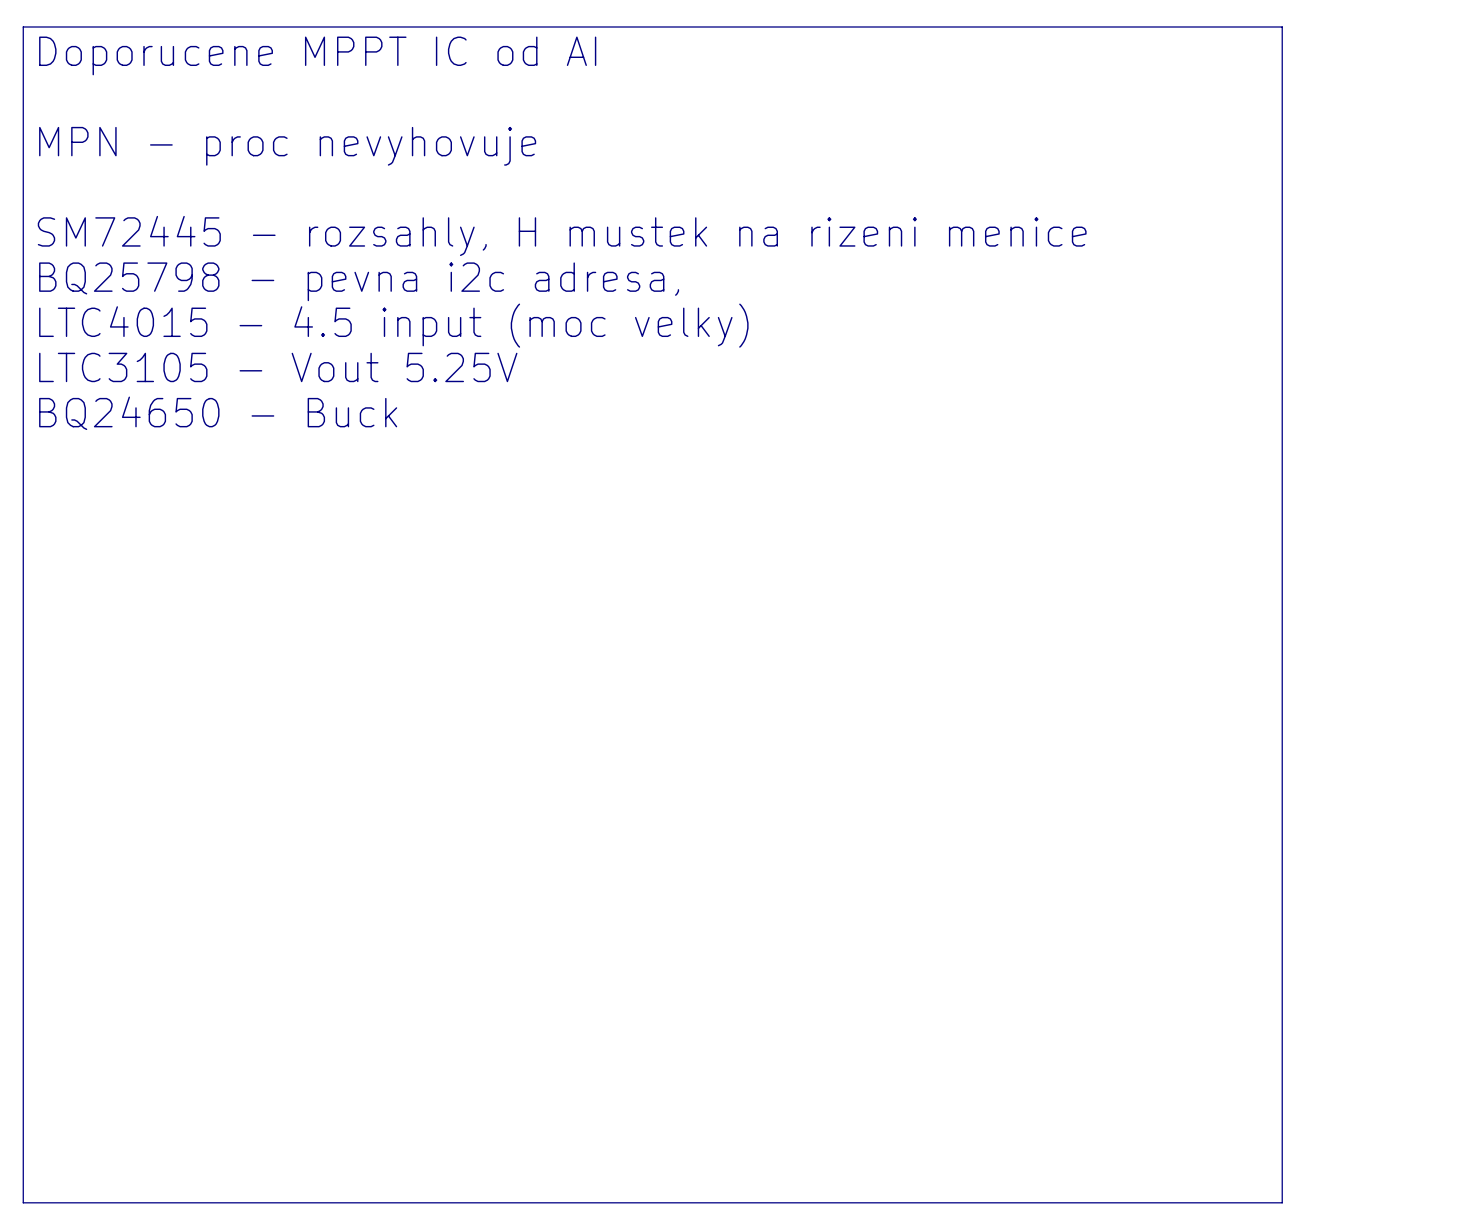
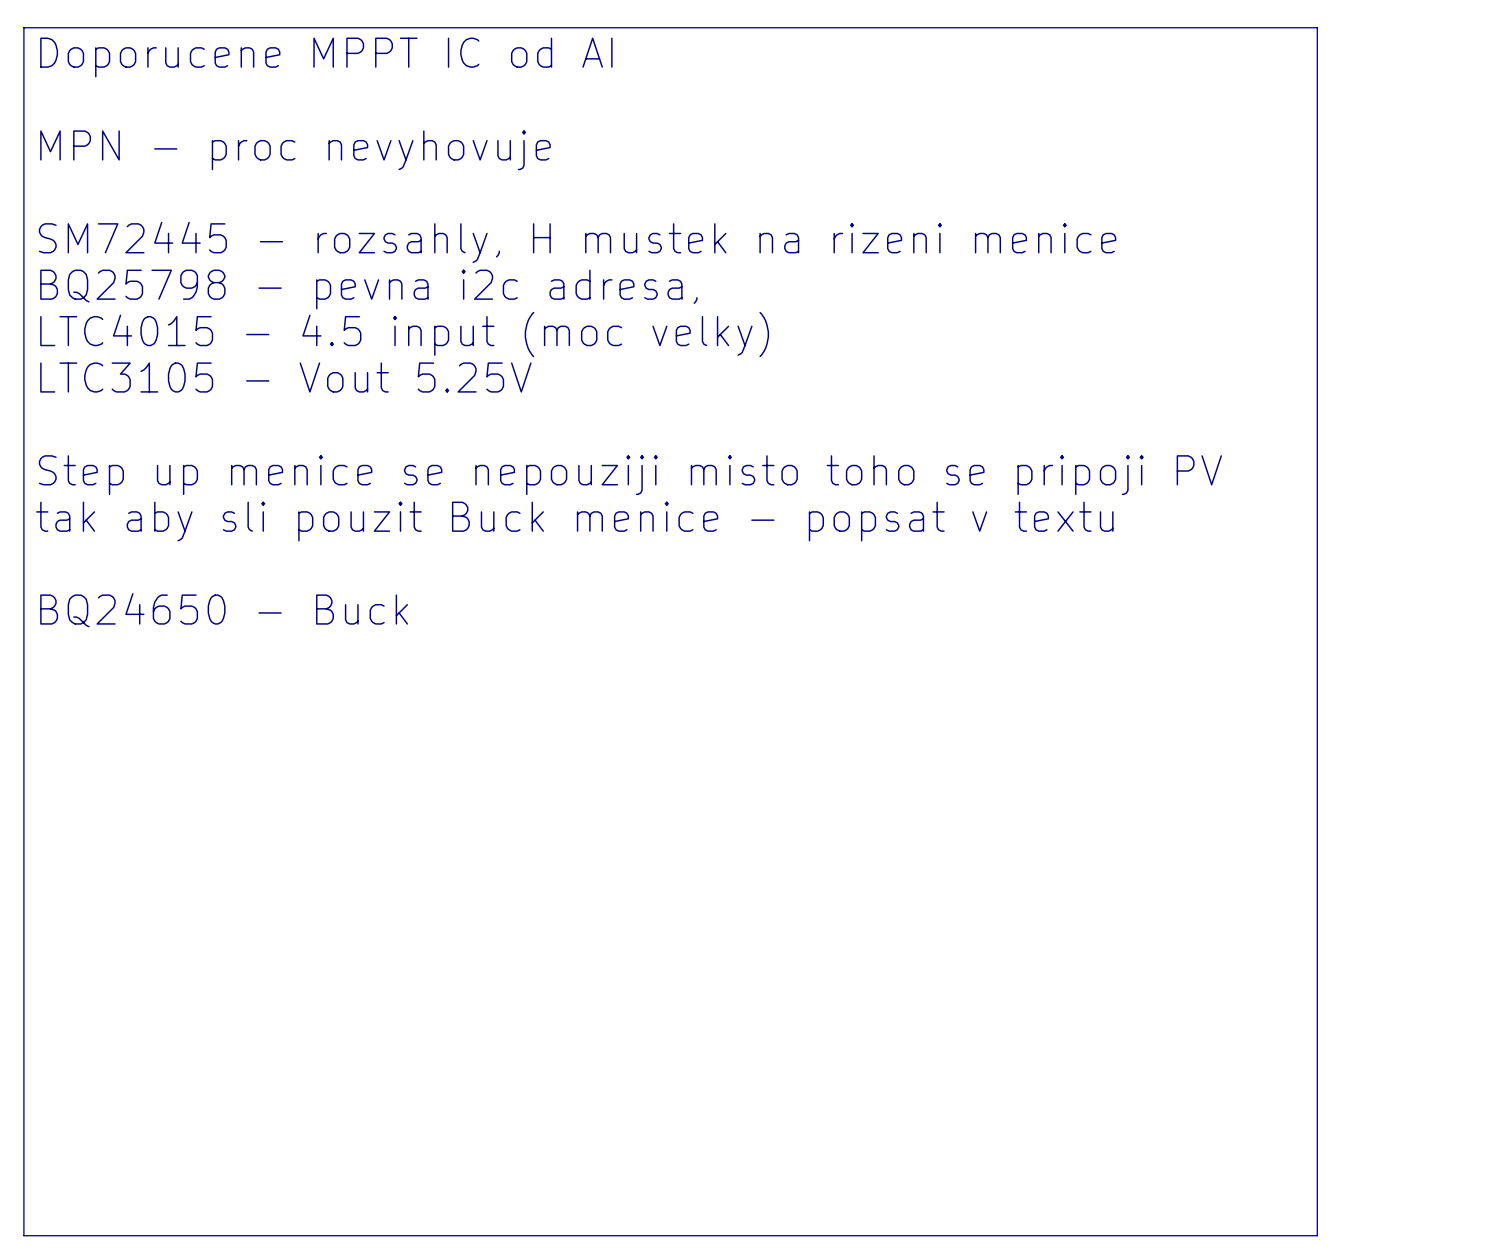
text position: BQ24650 - Buck (218, 413) -> BQ24650 - Buck (224, 610)
text: none -> Step up menice se nepouziji misto toho se pripoji PV (630, 475)
text: none -> tak aby sli pouzit Buck menice - popsat v textu (574, 521)

